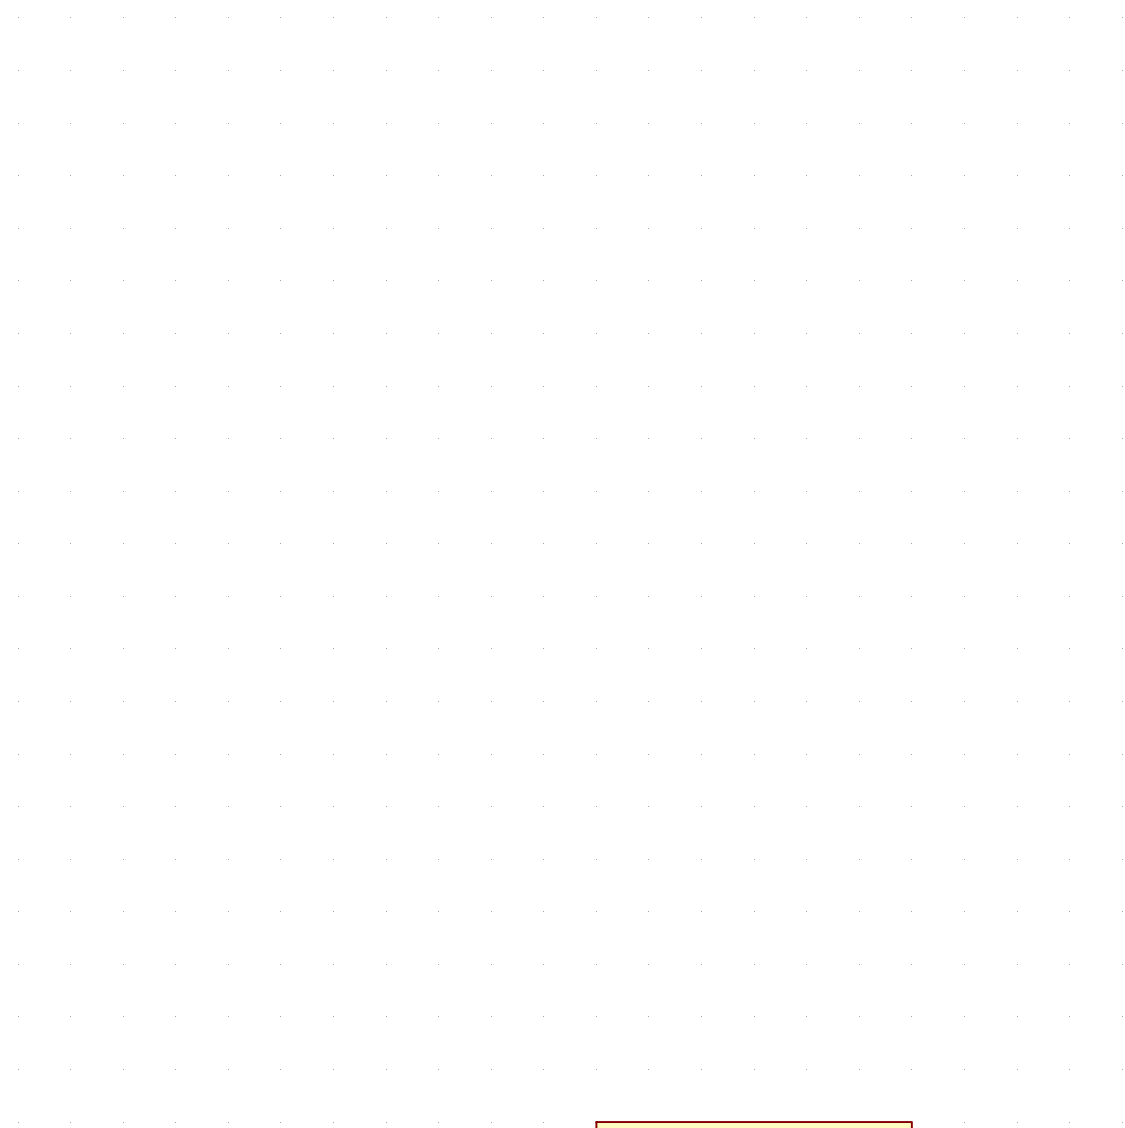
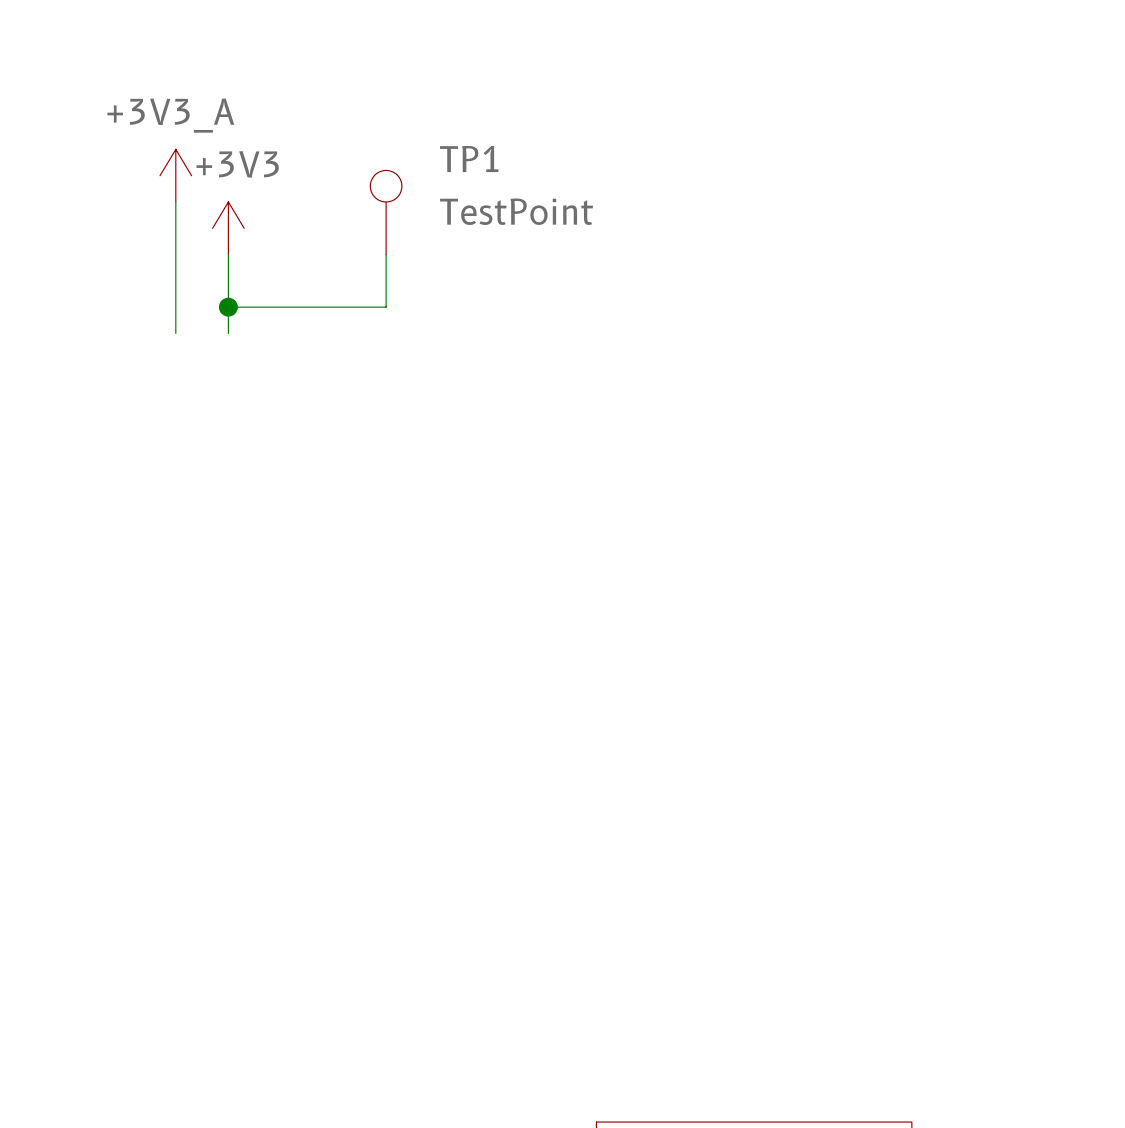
power symbol: none -> +3V3_A (175, 175)
wire: none -> (175, 201) (175, 333)
TP1: none -> TestPoint (386, 212)
power symbol: none -> +3V3 (228, 228)
wire: none -> (228, 254) (228, 333)
wire: none -> (386, 254) (386, 307) (228, 307)
junction: none -> (228, 307)

